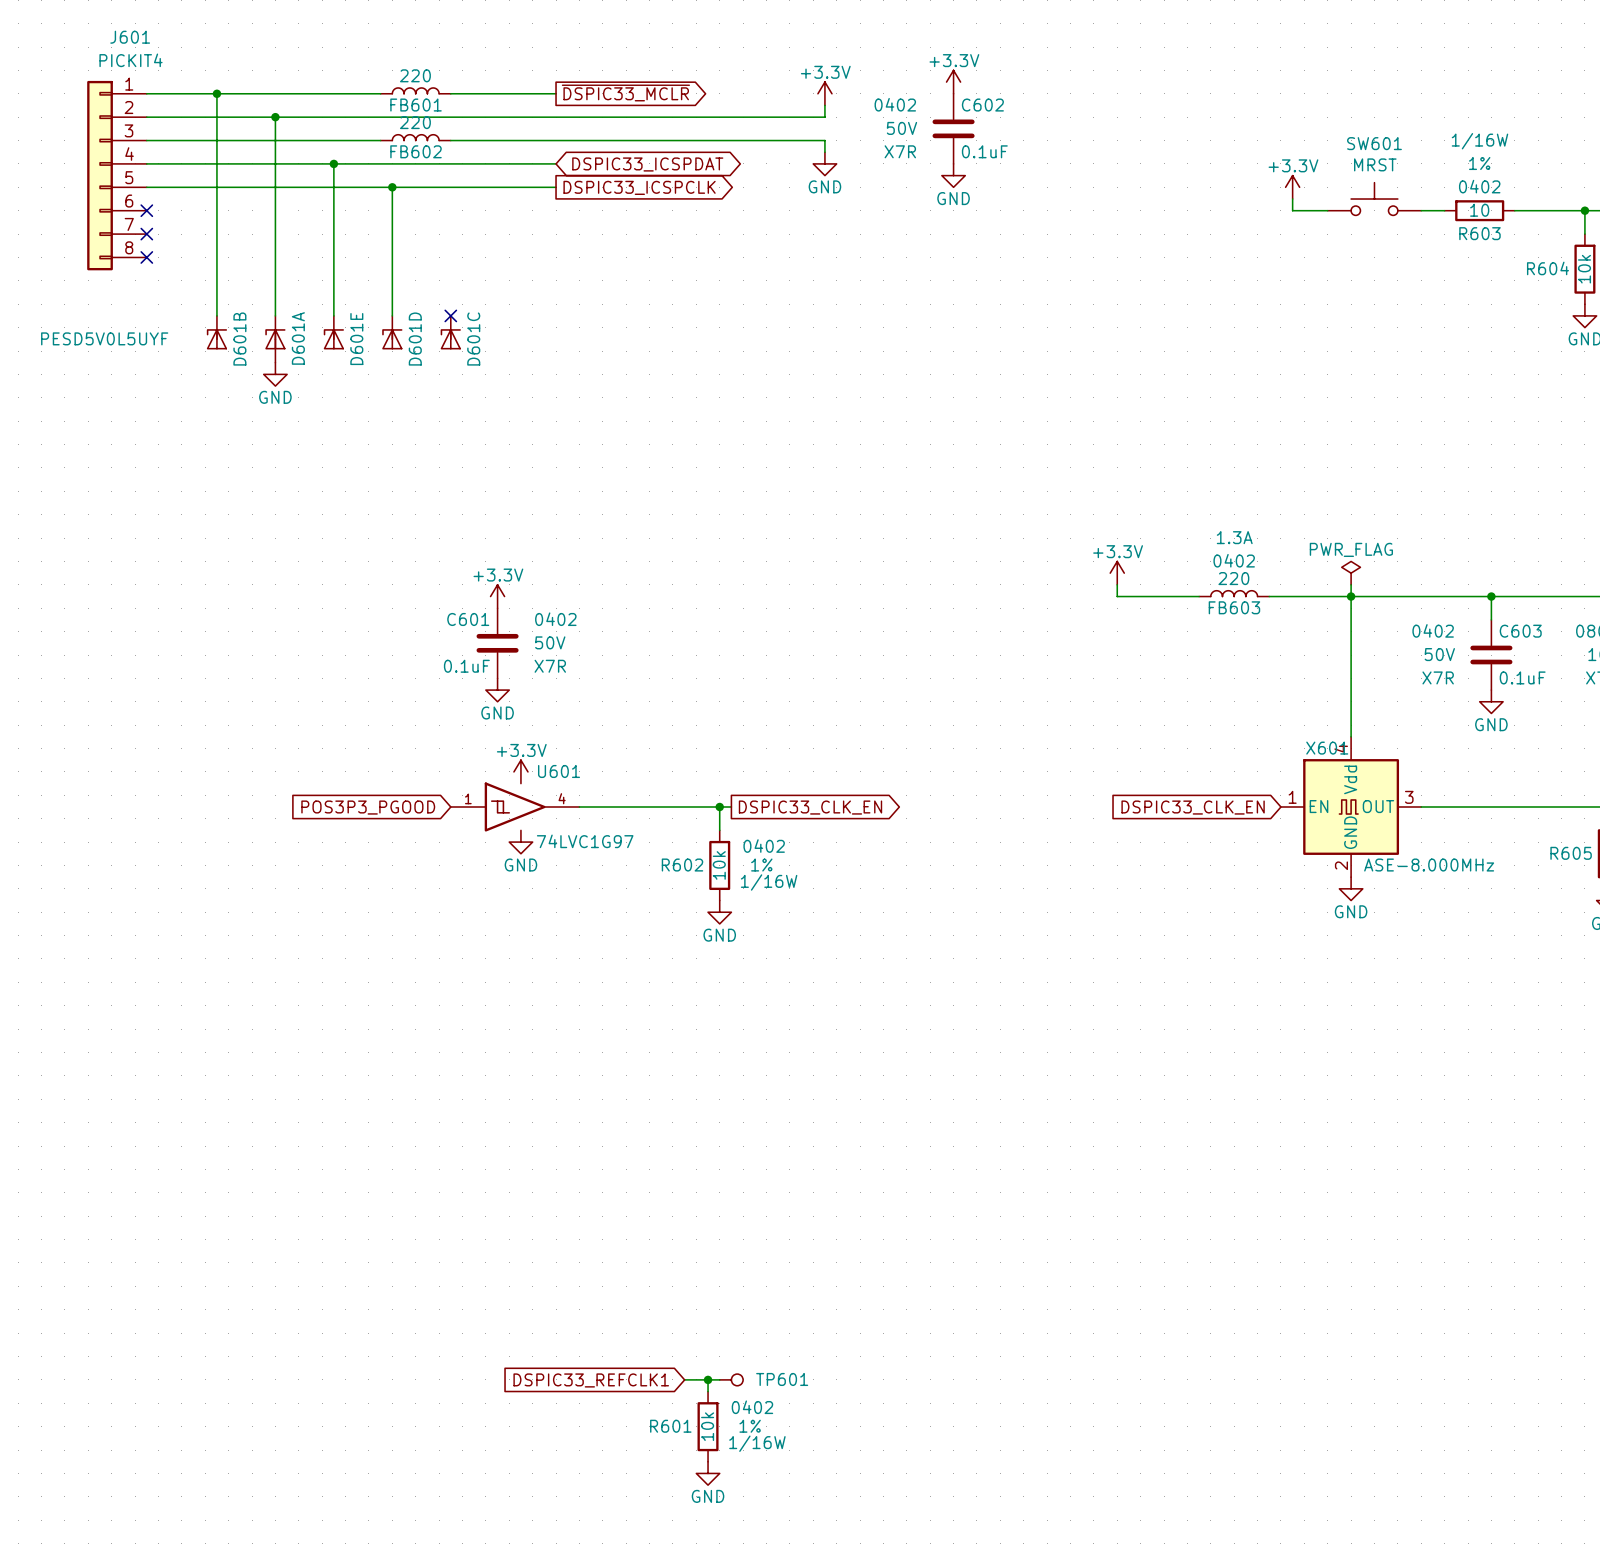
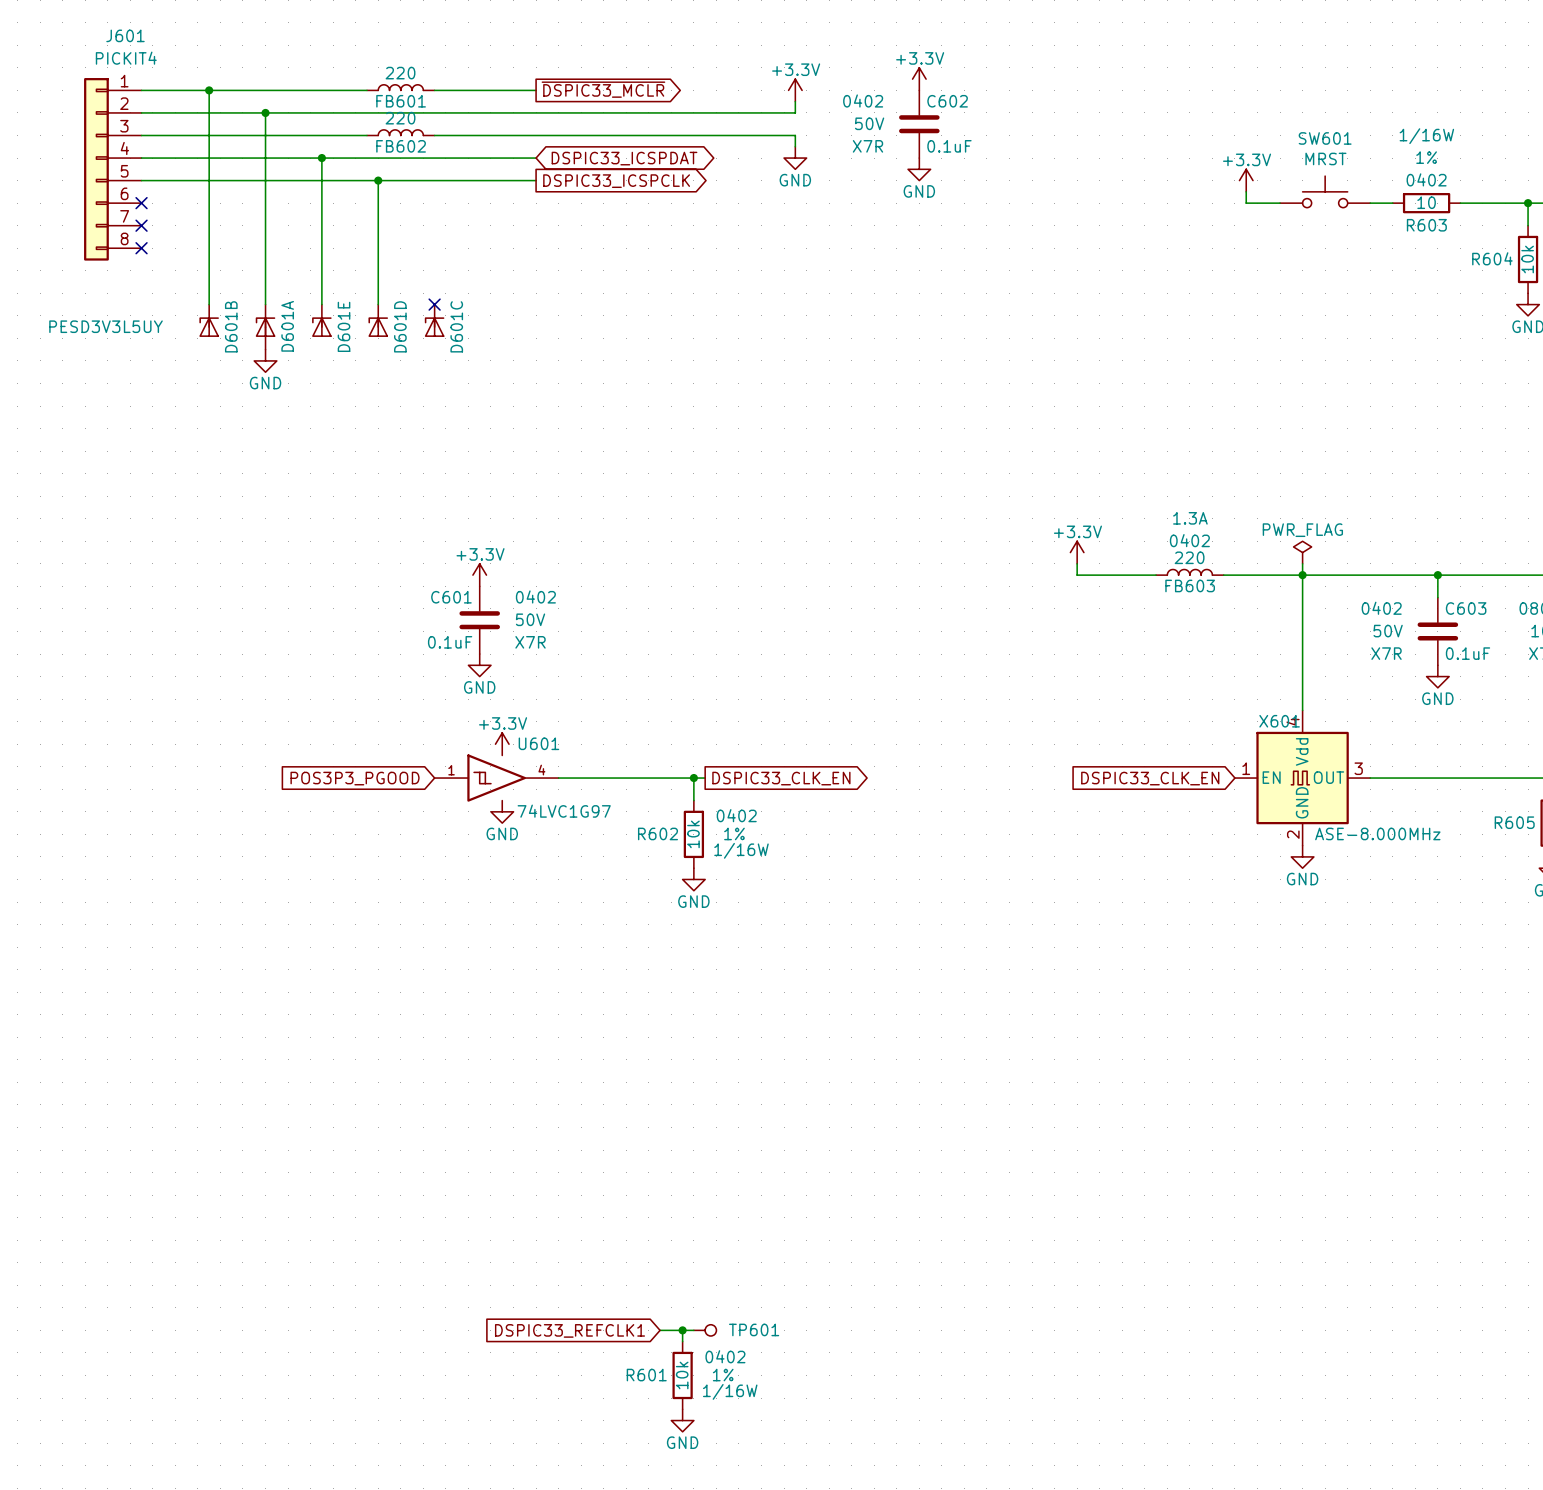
D601A value: PESD5V0L5UYF (104, 338) -> PESD3V3L5UY (106, 326)

